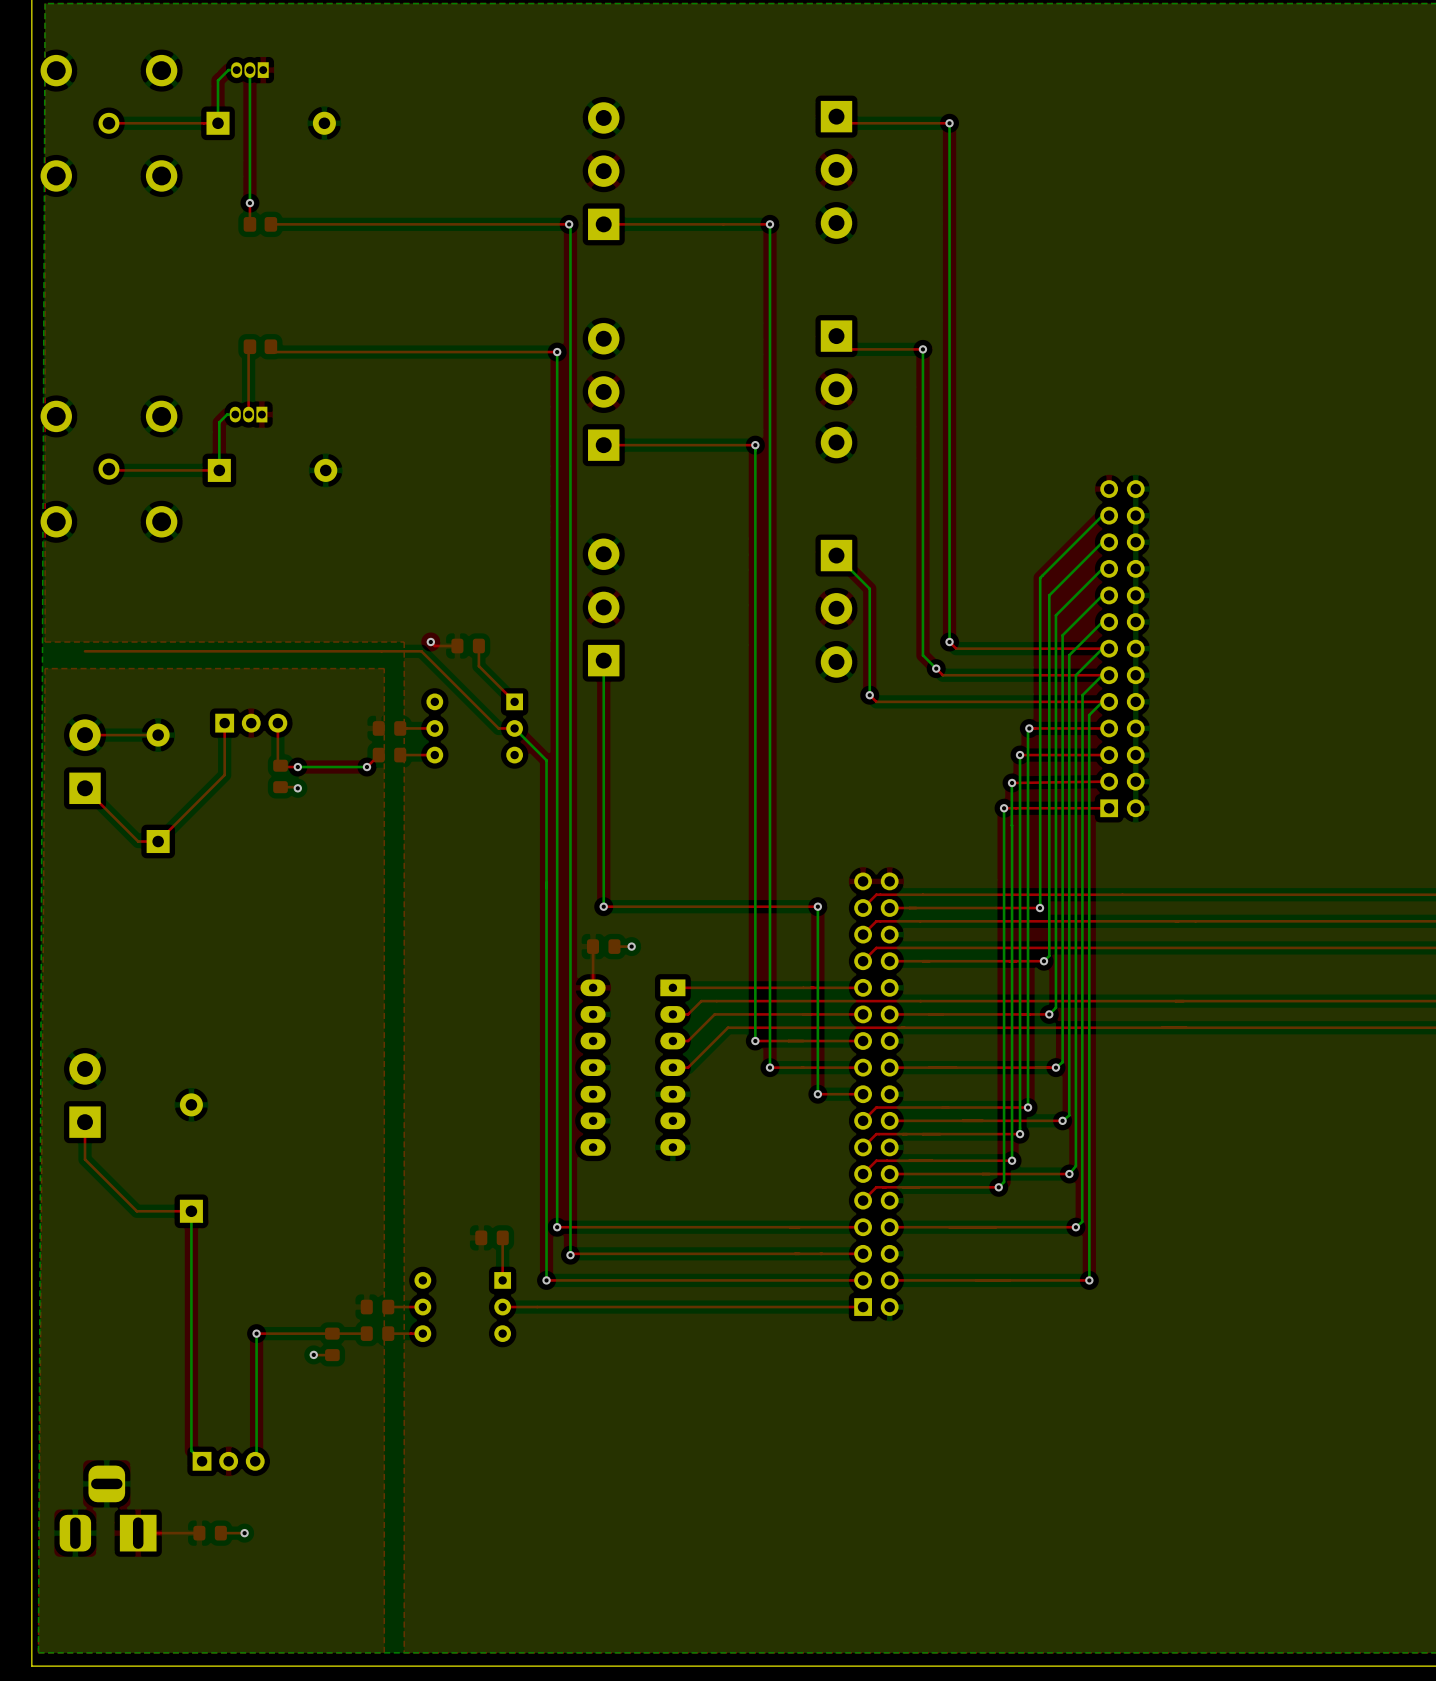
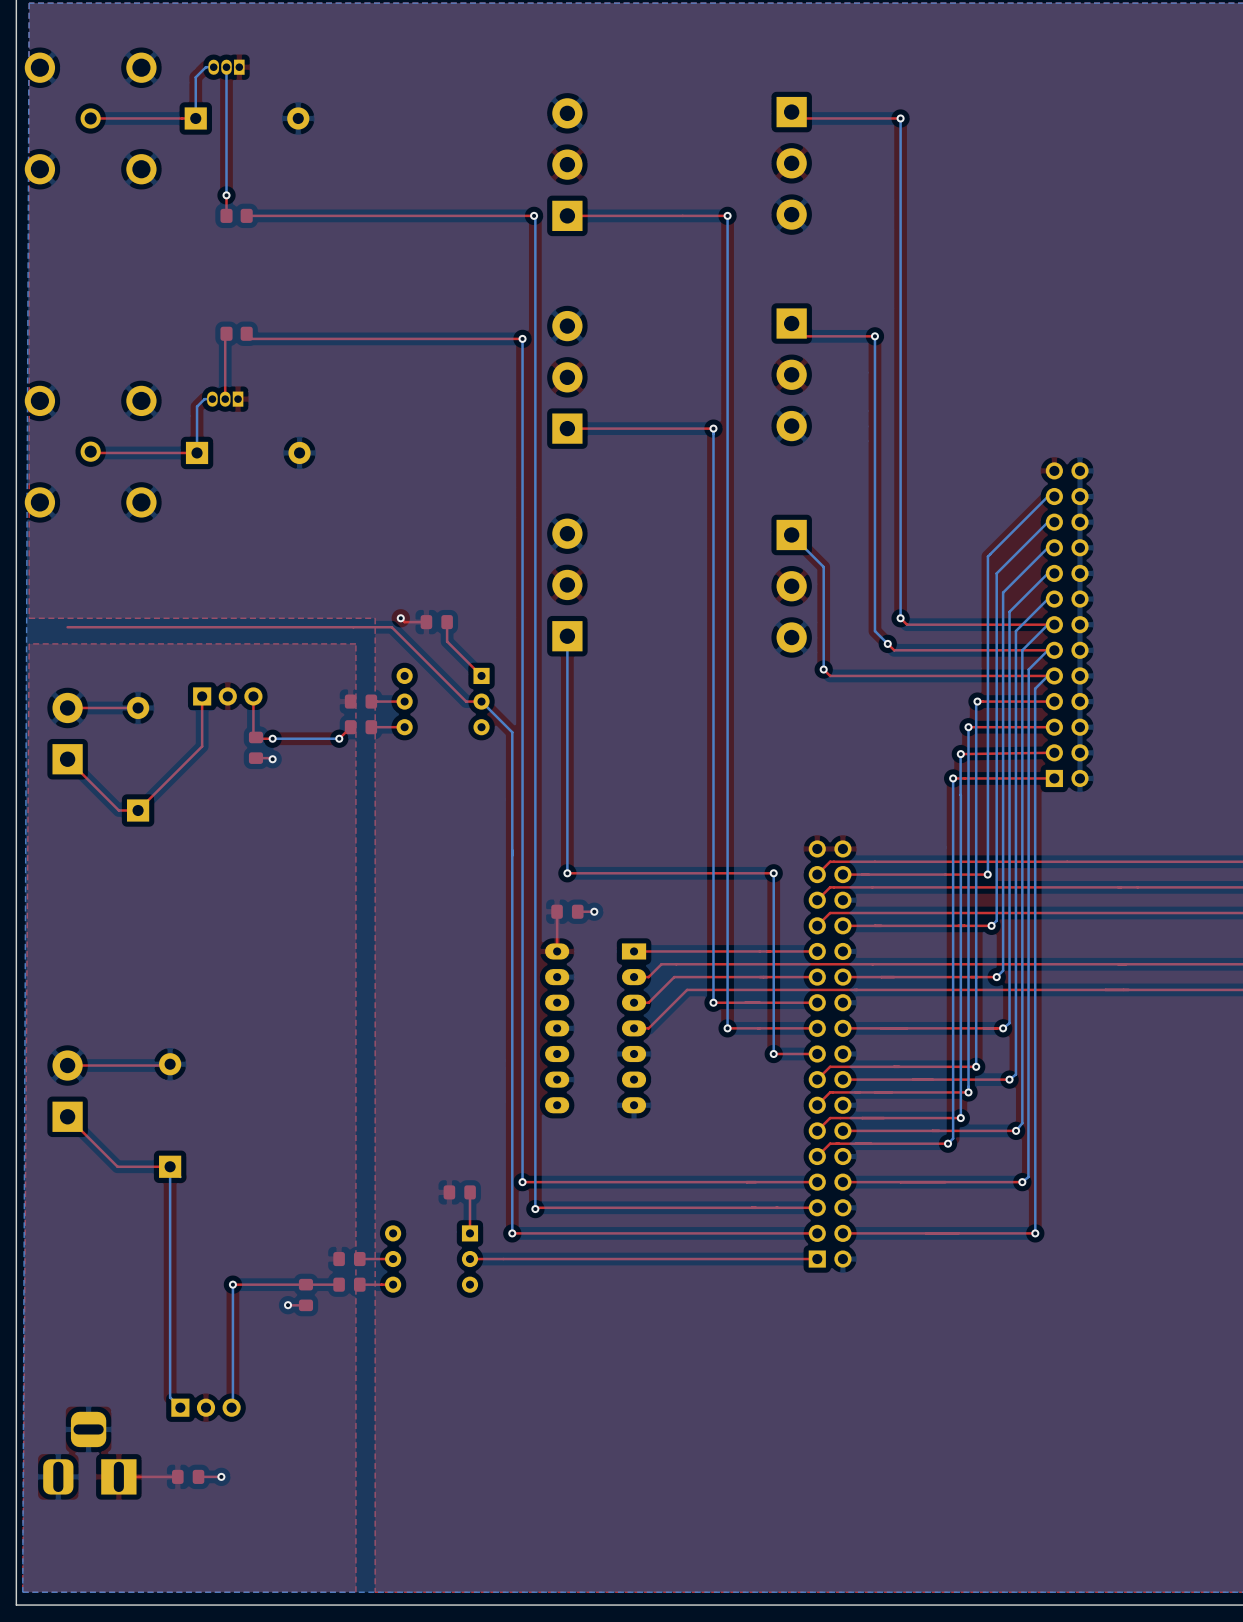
part position: (85, 1095) -> (67, 1091)
top track: none -> (170, 1064) (67, 1065)
top track: (85, 1123) (85, 1159) -> none

